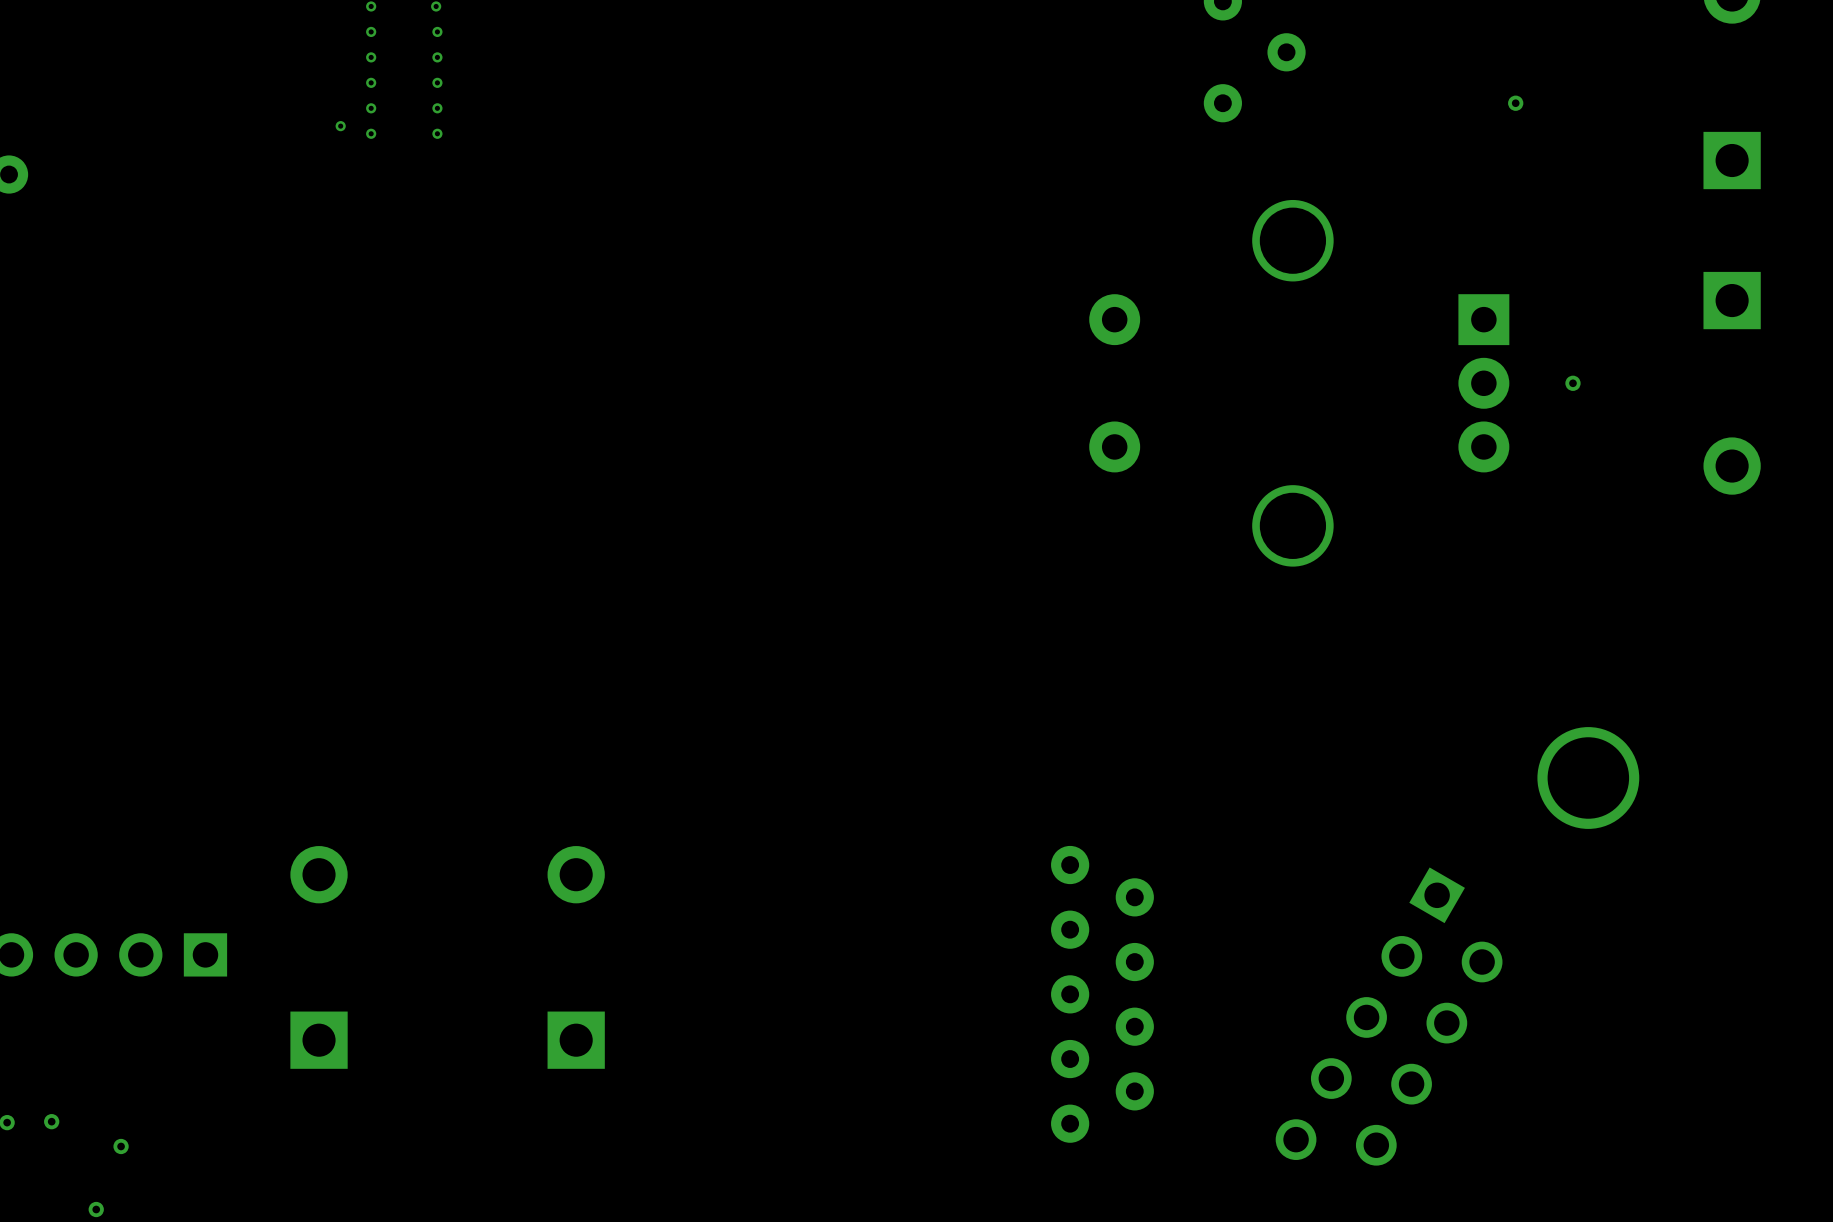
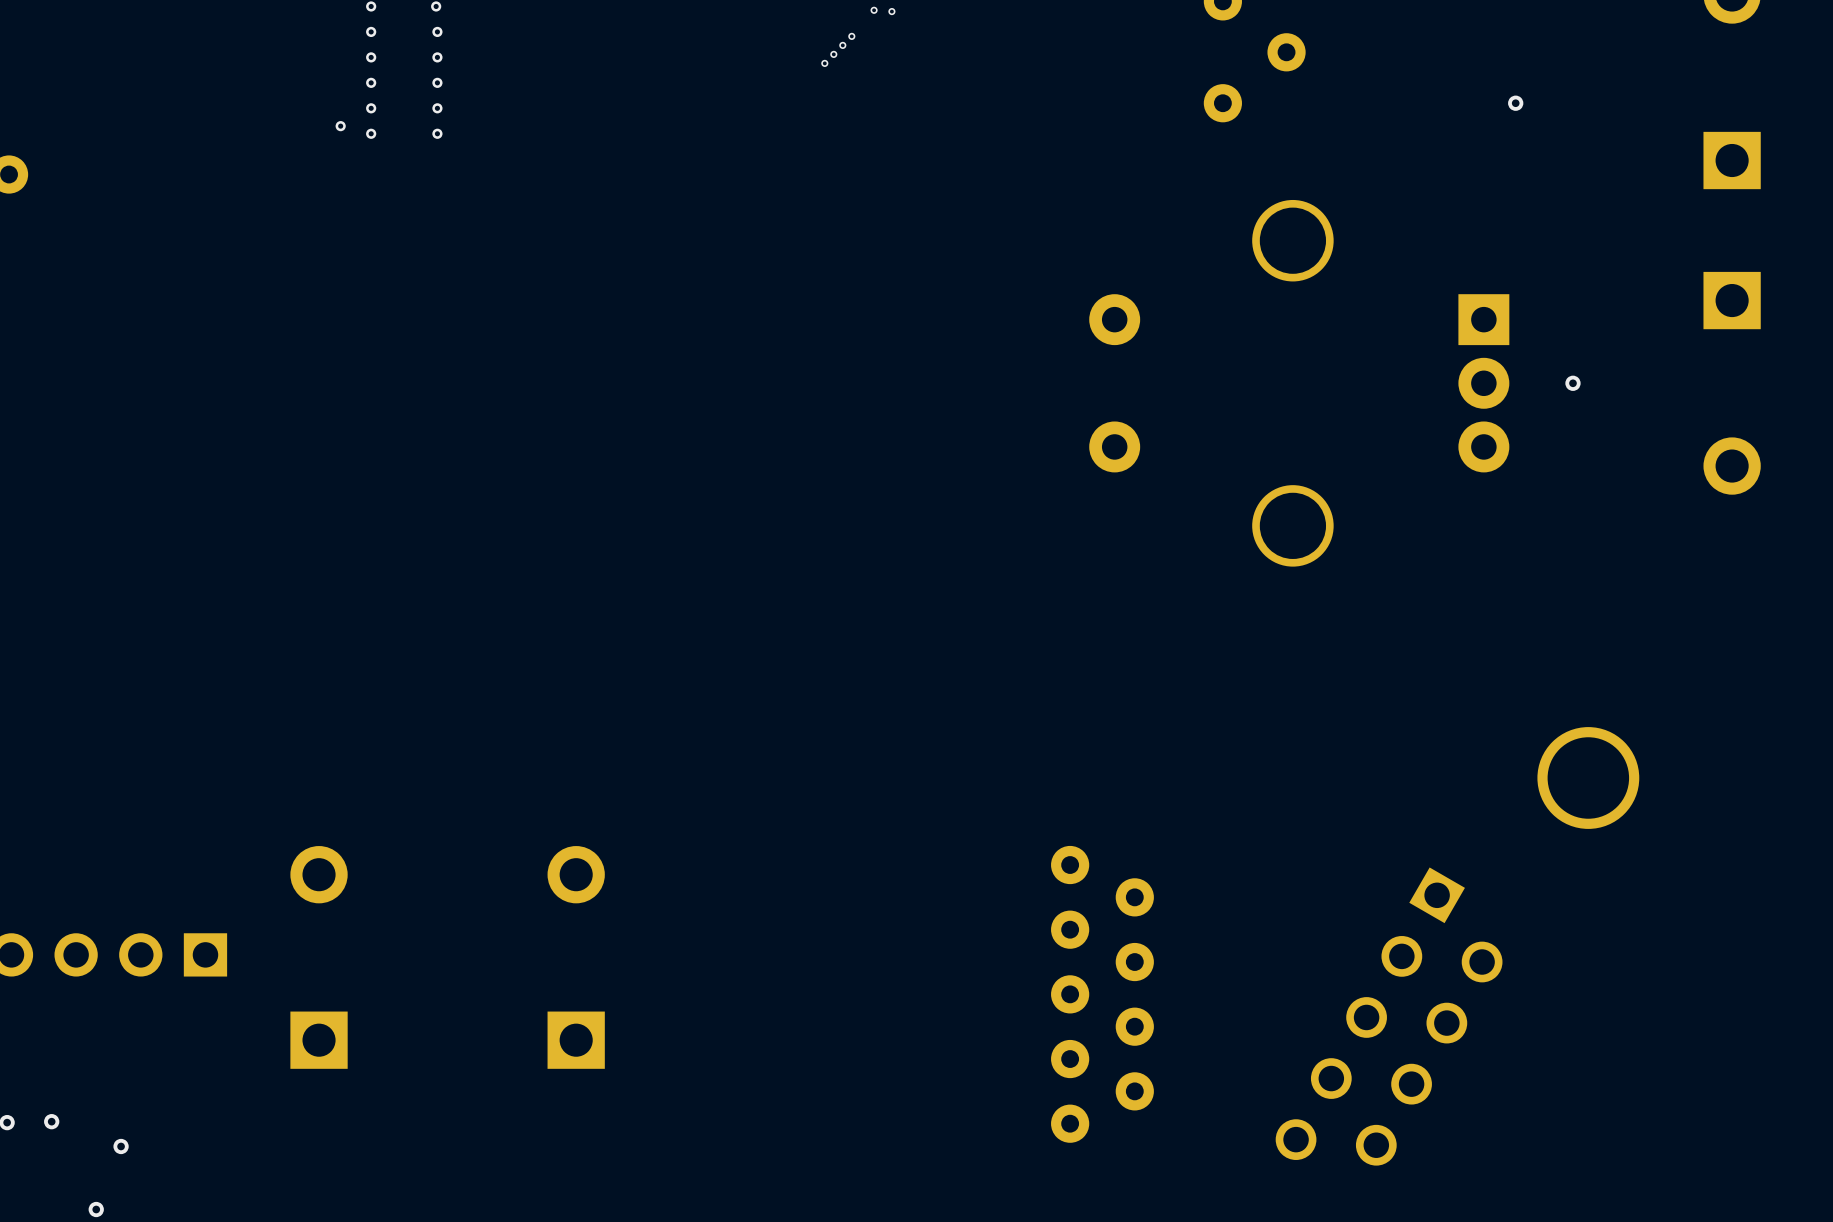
via: none -> (874, 10)
via: none -> (891, 11)
via: none -> (851, 36)
via: none -> (842, 45)
via: none -> (833, 54)
via: none -> (824, 63)

